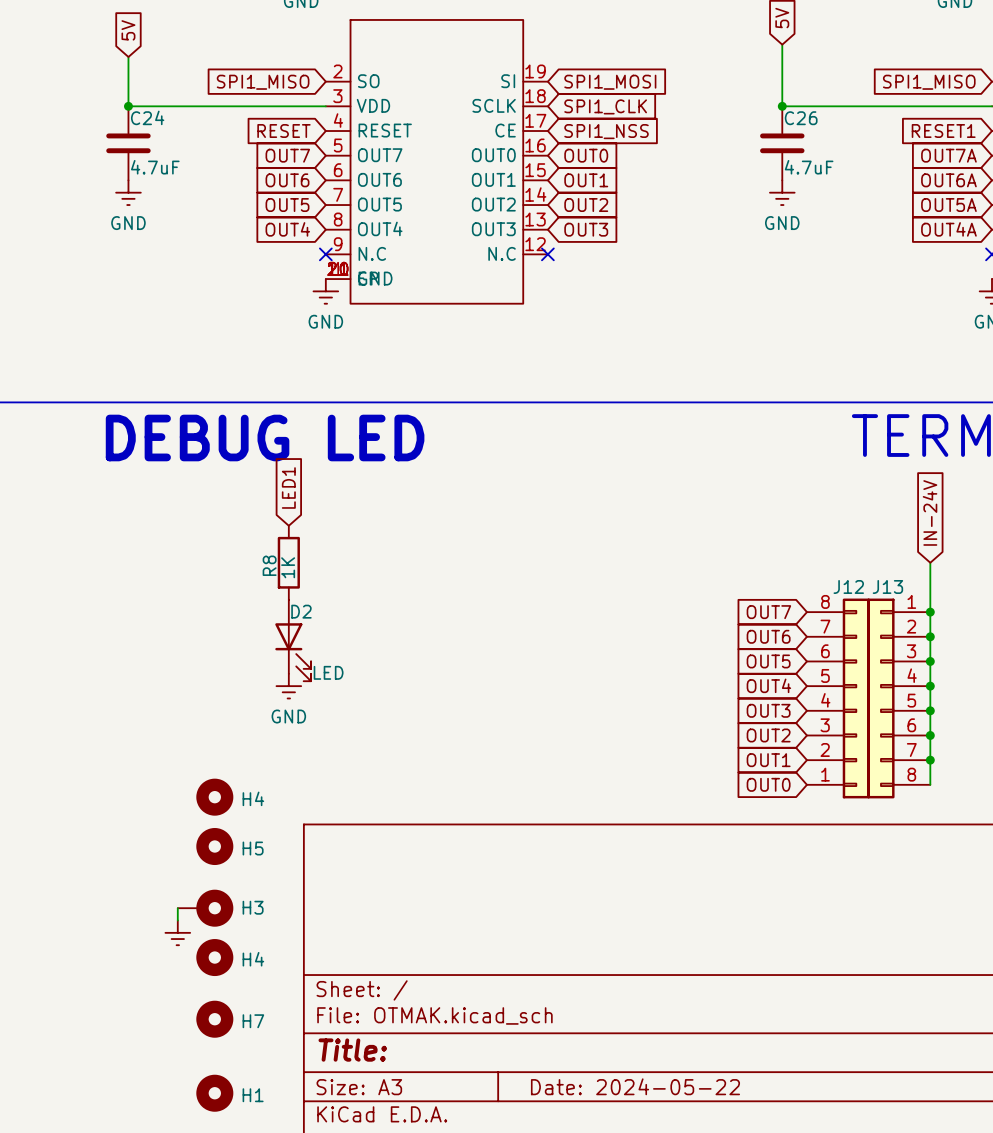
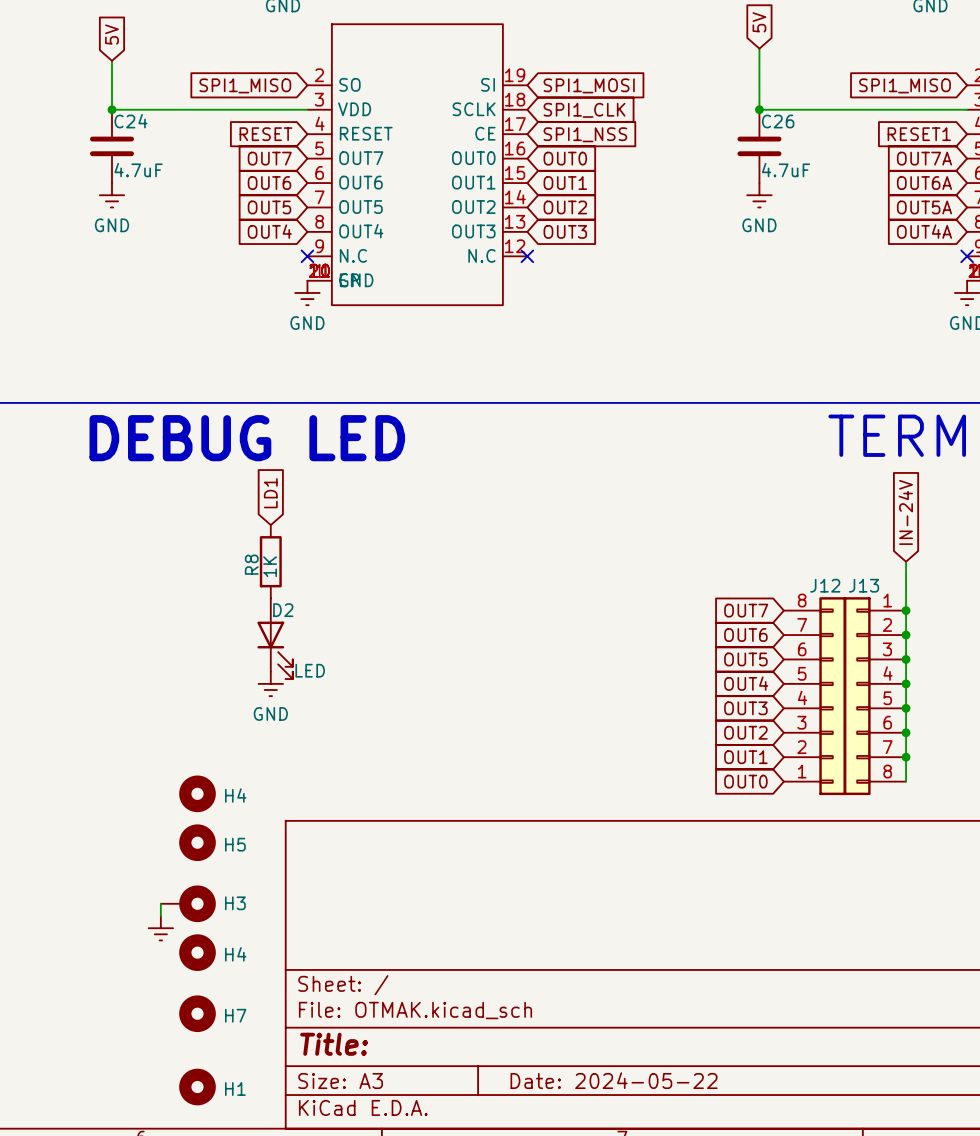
global label: LED1 (288, 488) -> LD1 (270, 493)

